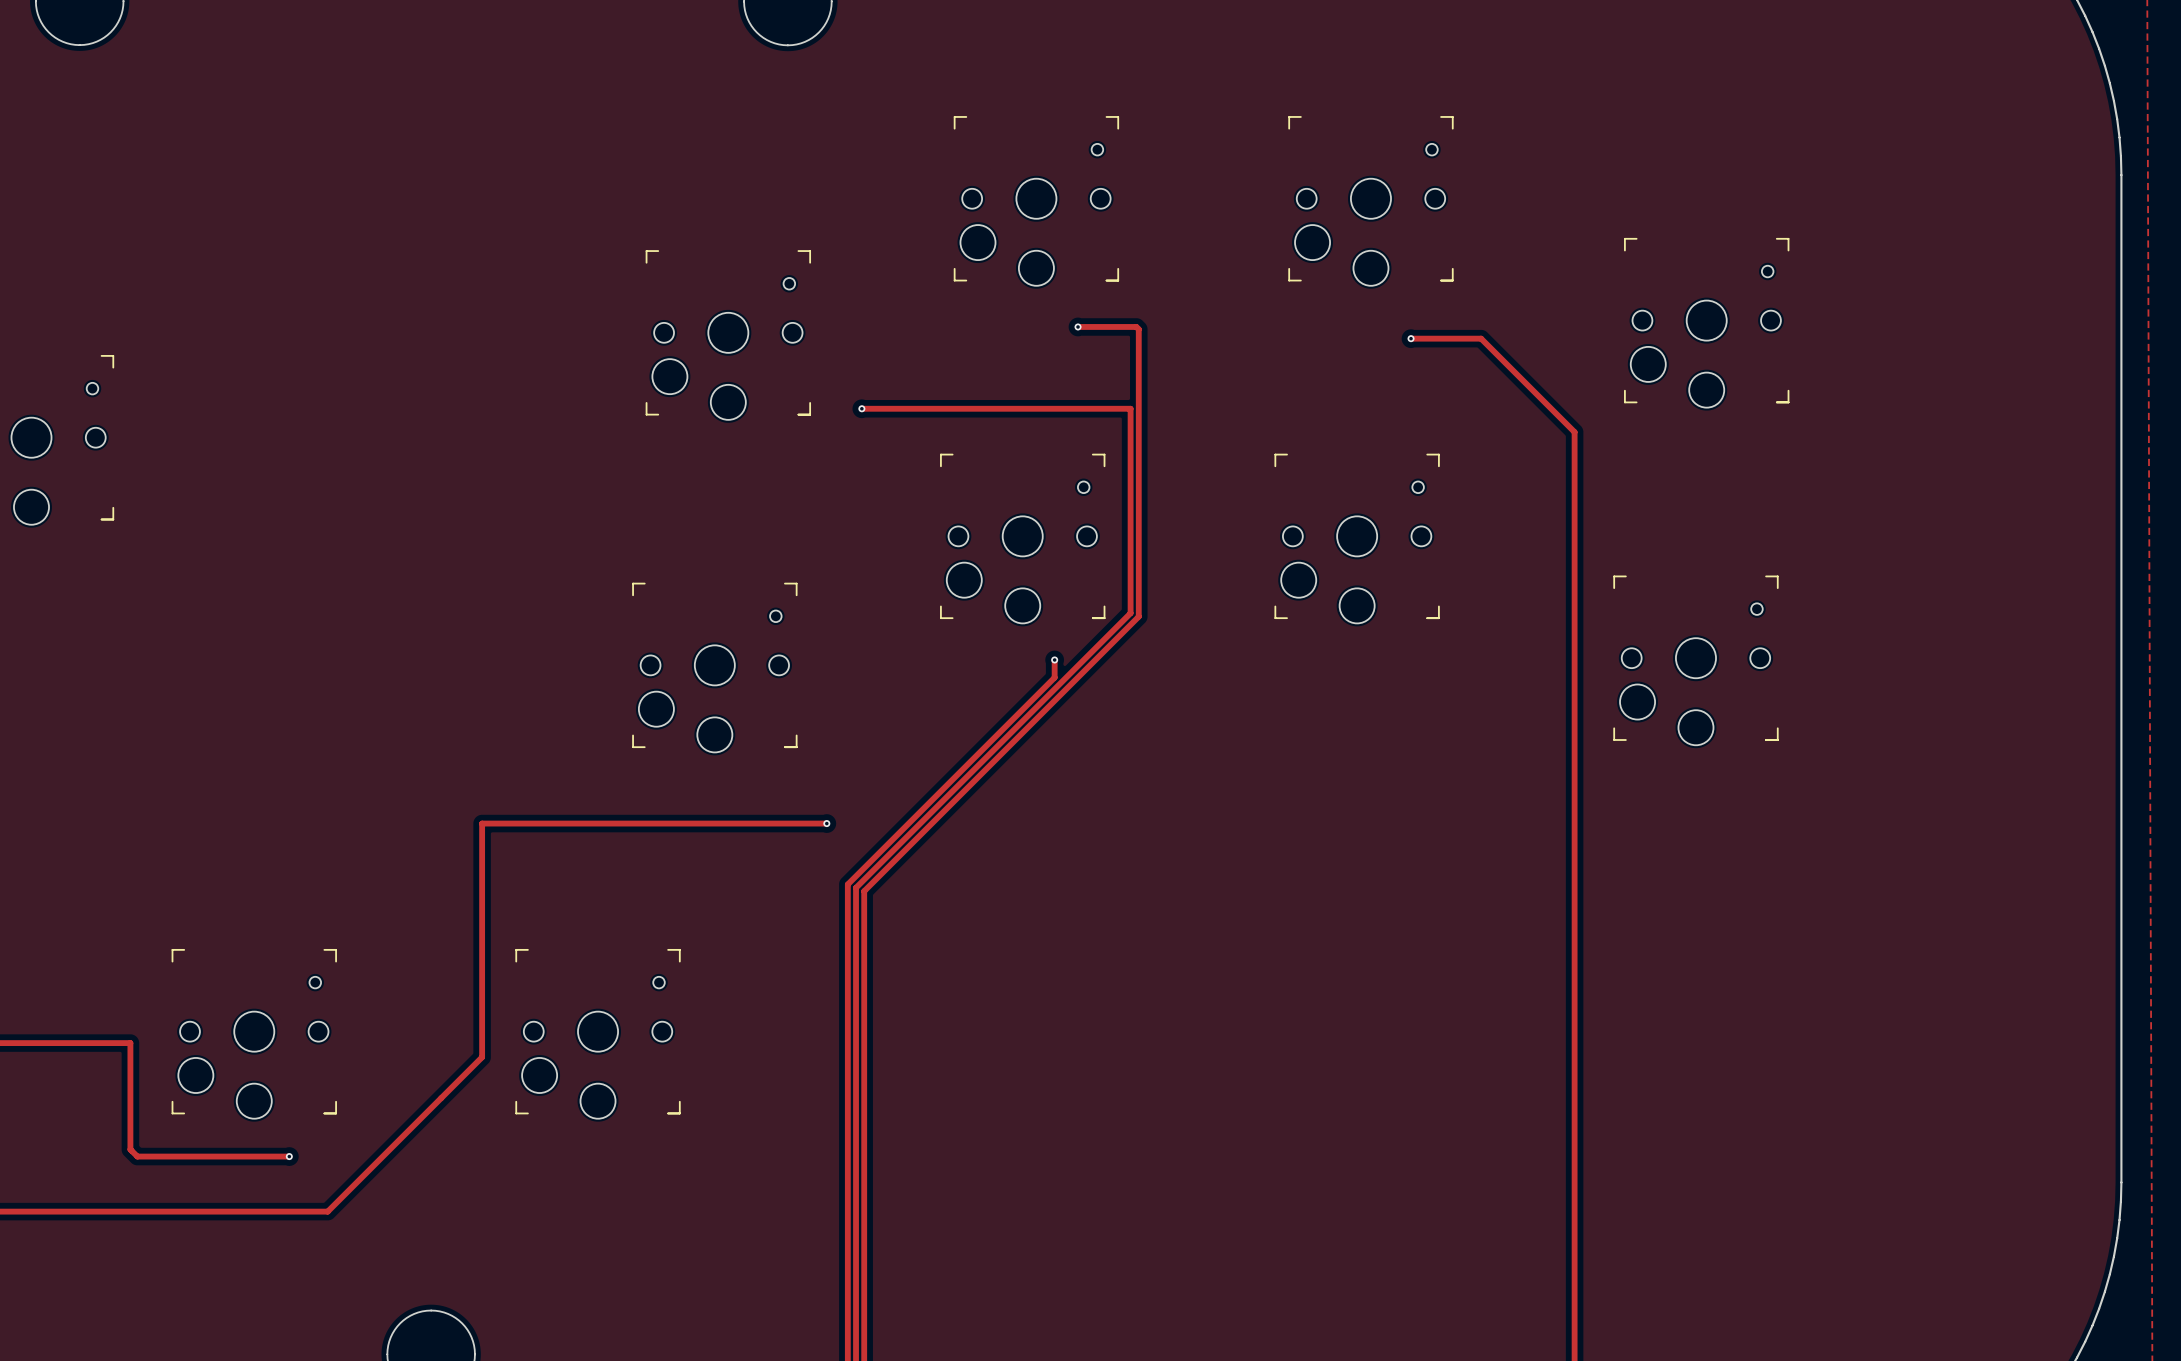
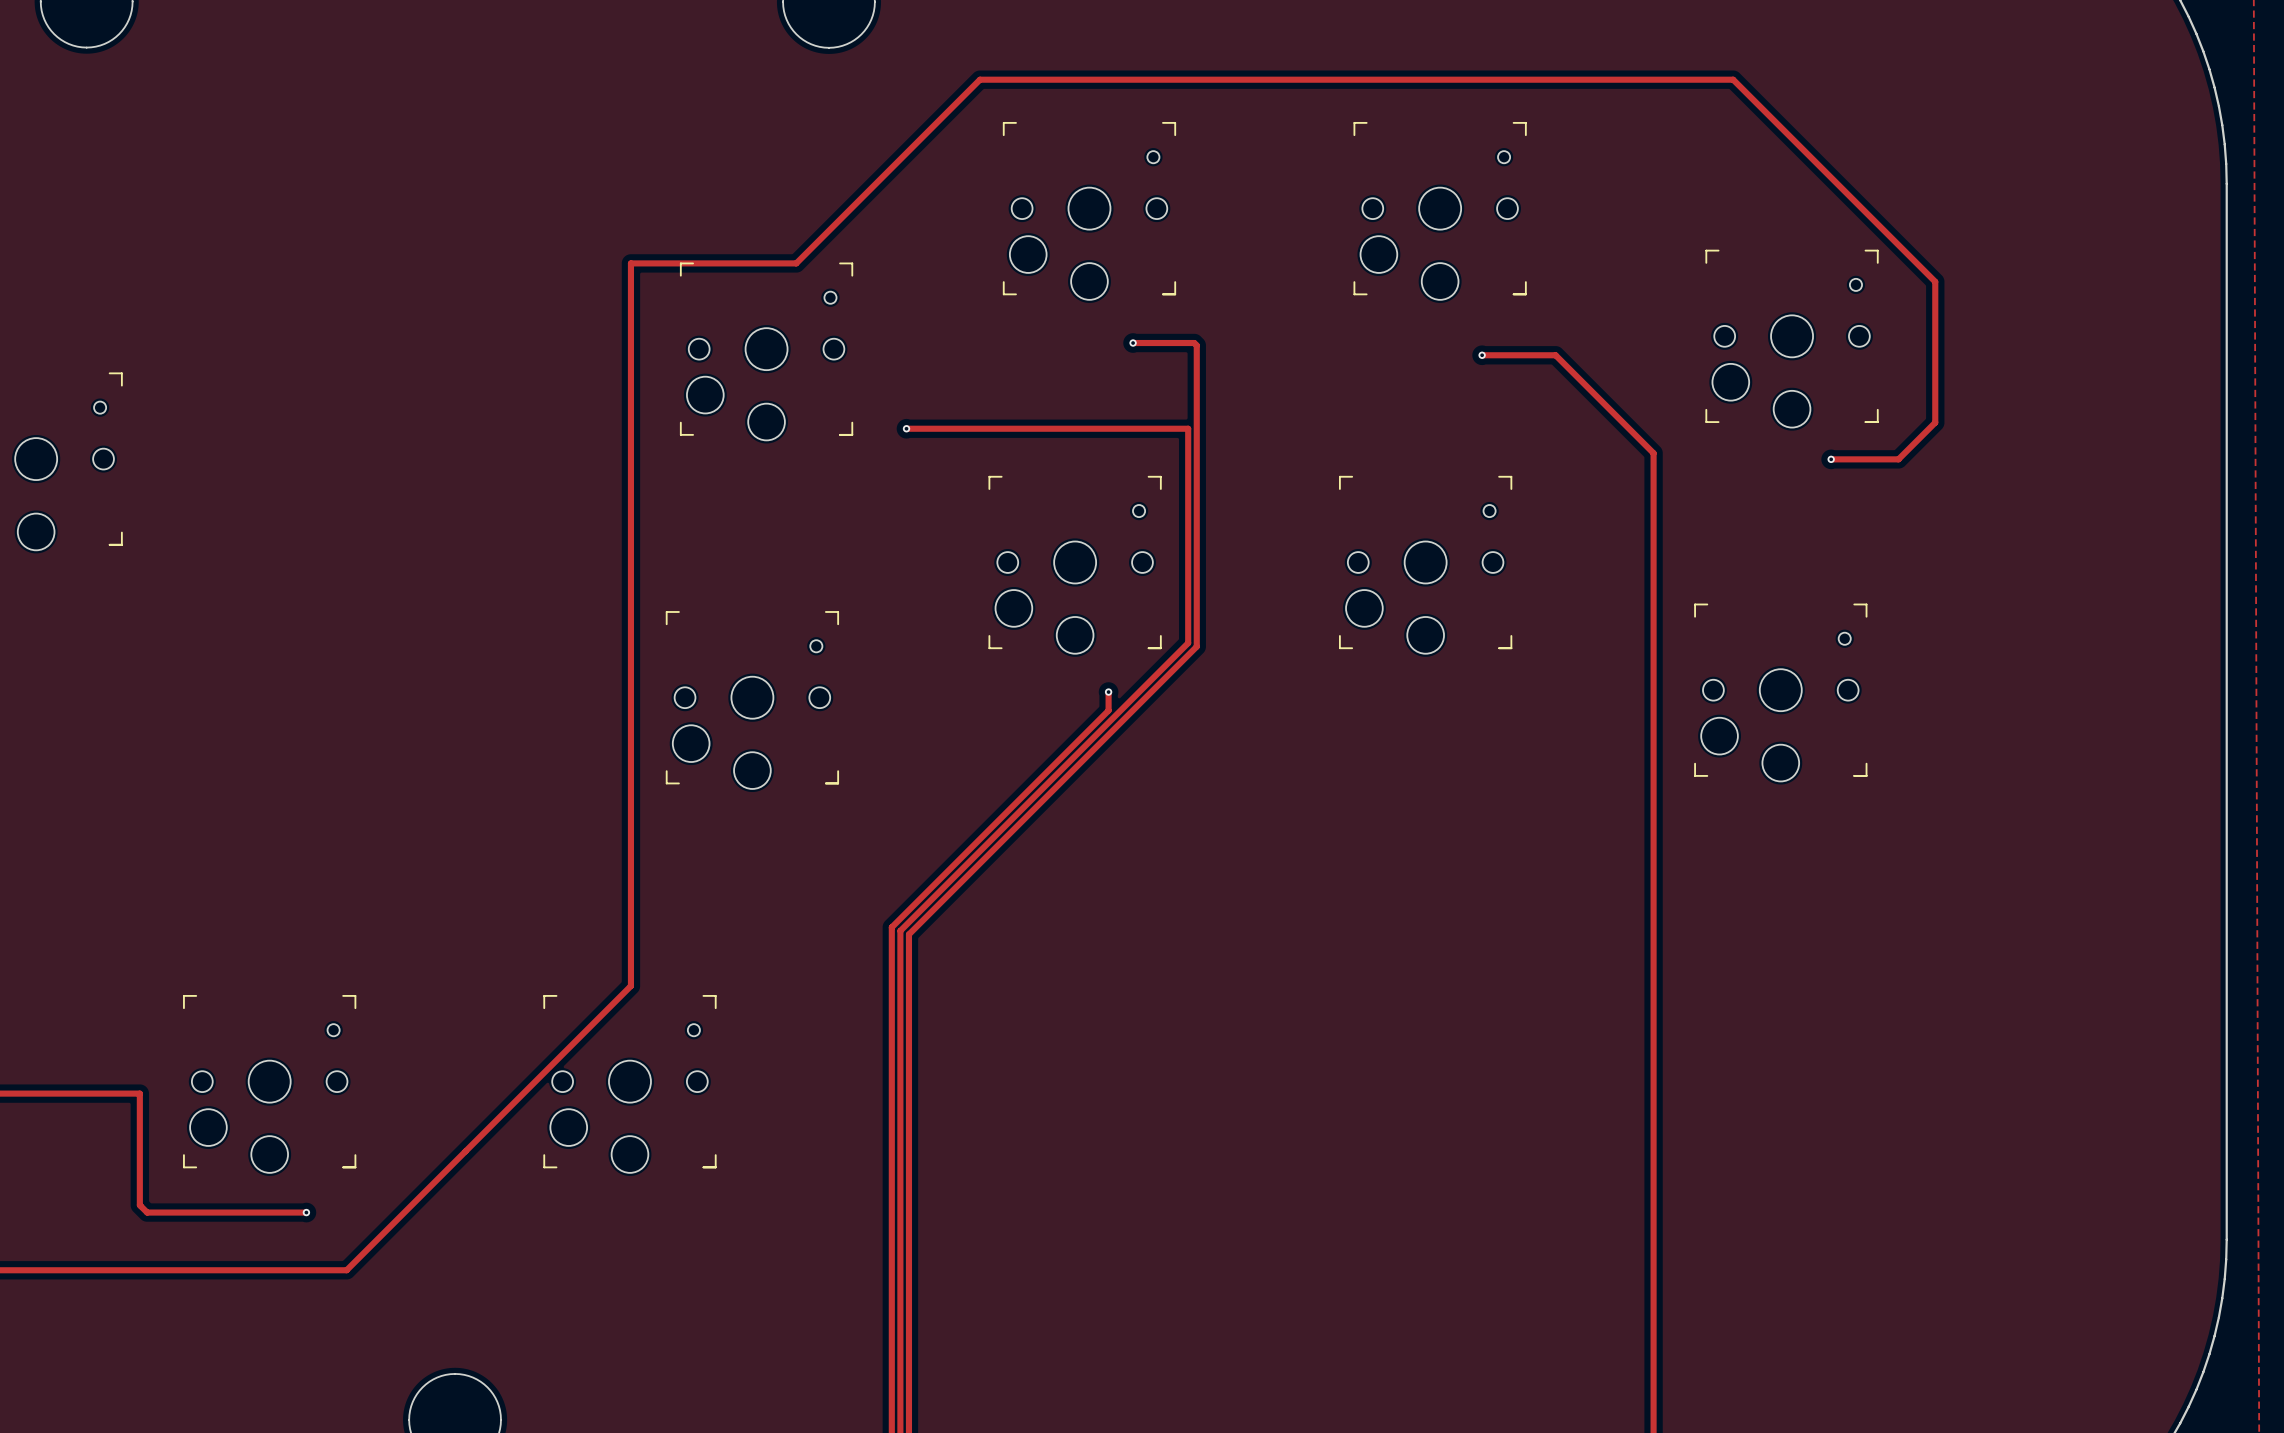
via: none -> (1831, 459)
track: (826, 823) (482, 823) (482, 1057) -> (1831, 459) (1898, 459) (1935, 422) (1935, 281) (1733, 79) (979, 79) (796, 263) (630, 263) (630, 985) (508, 1108)
via: (826, 823) -> none

